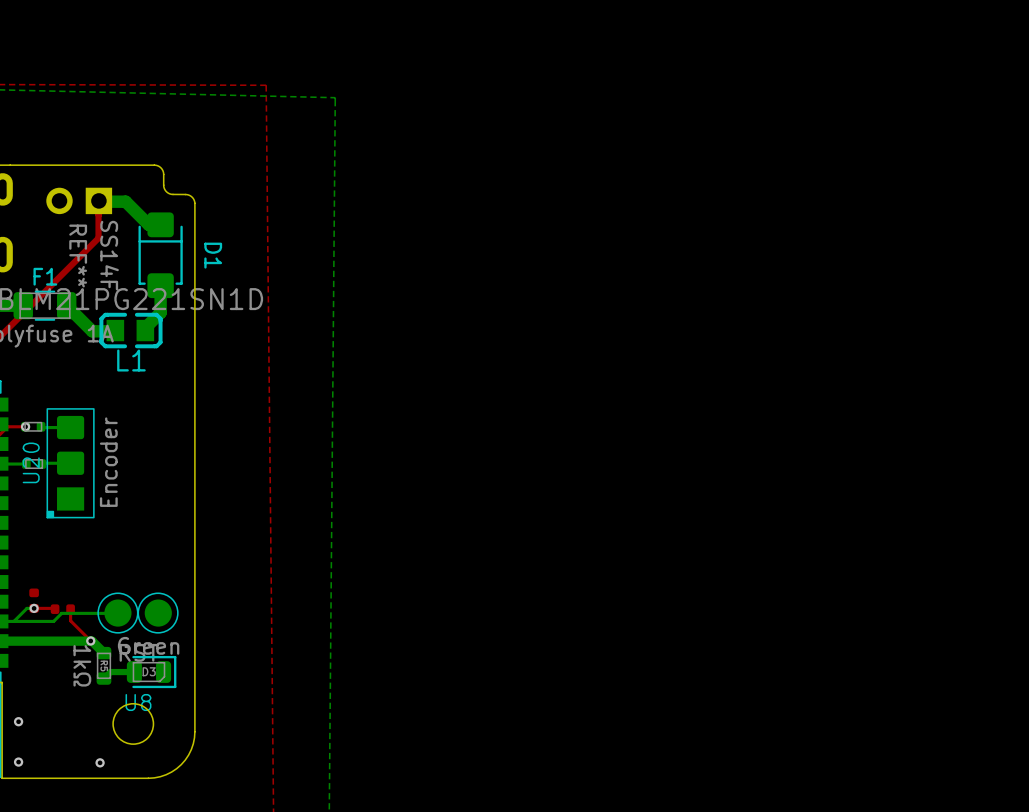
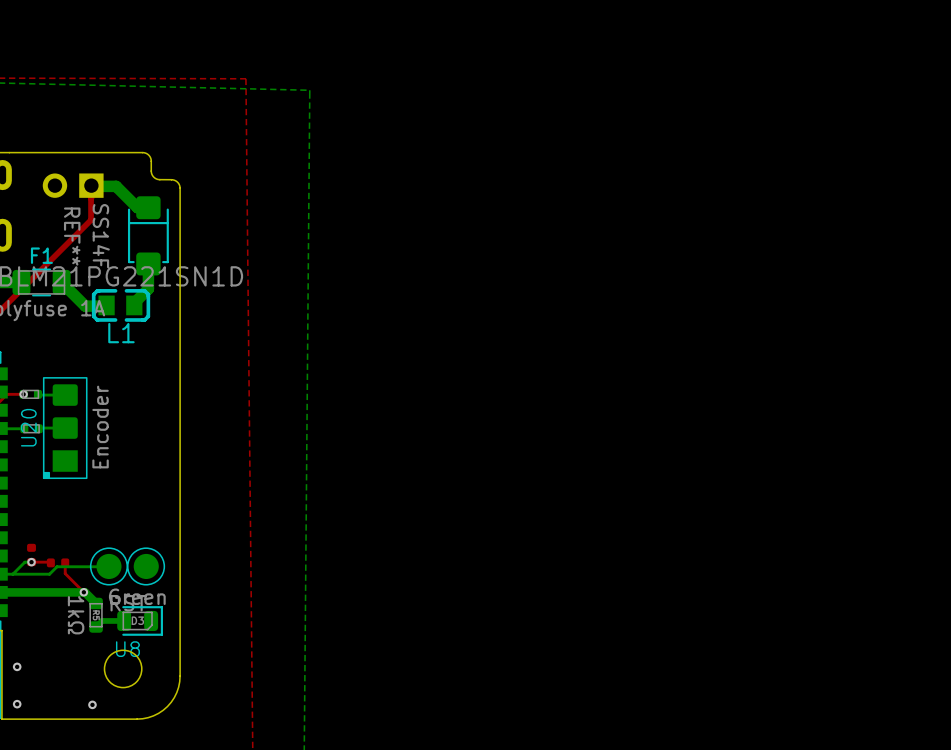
D1 name: D1 (213, 255) -> none

